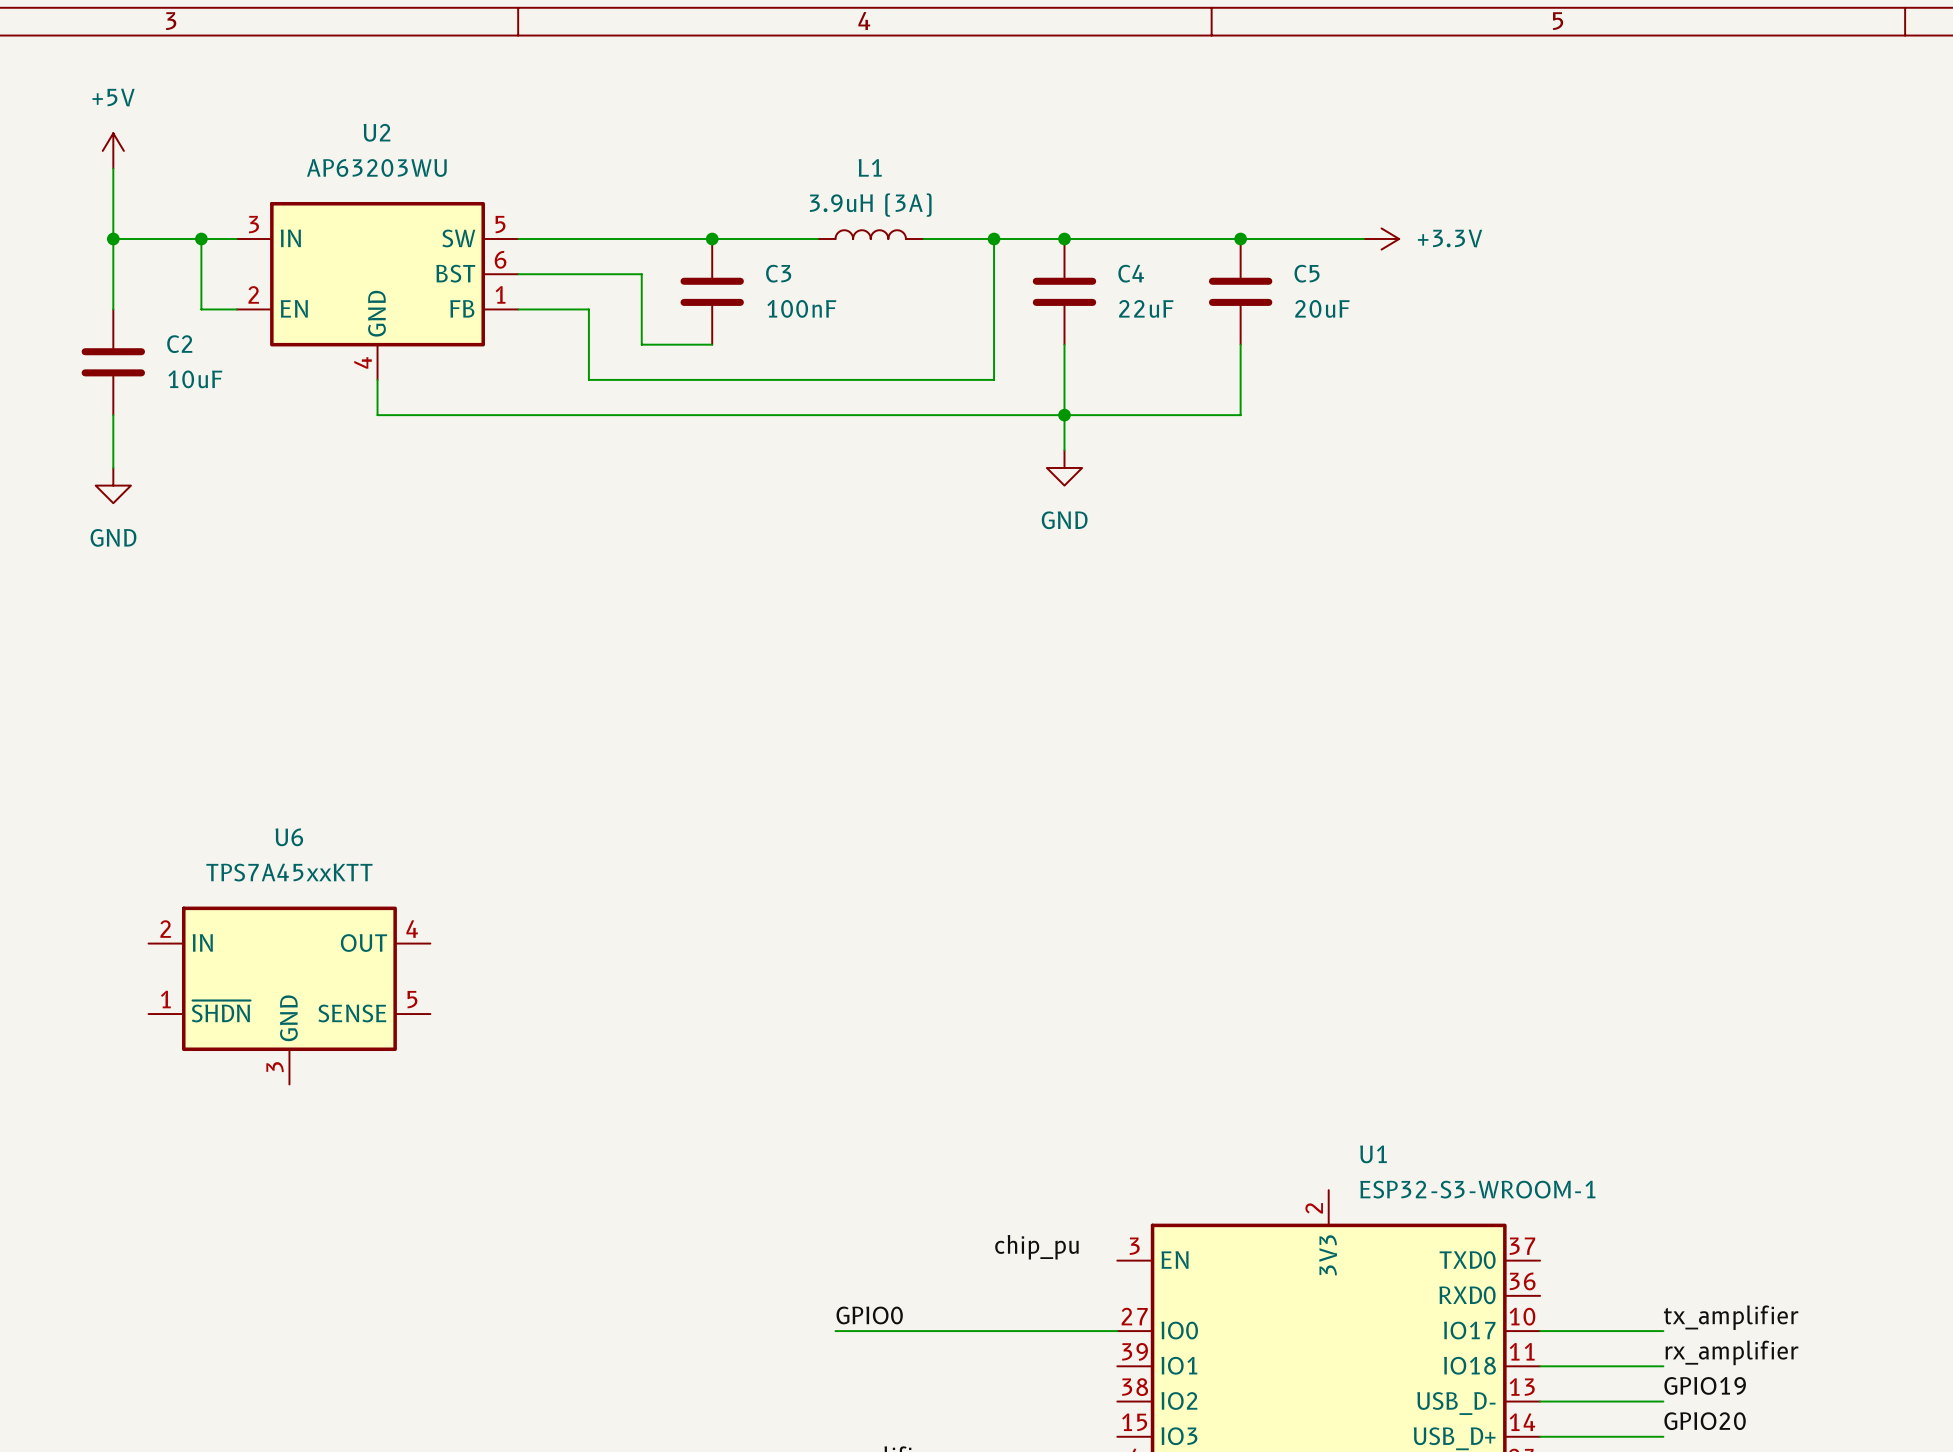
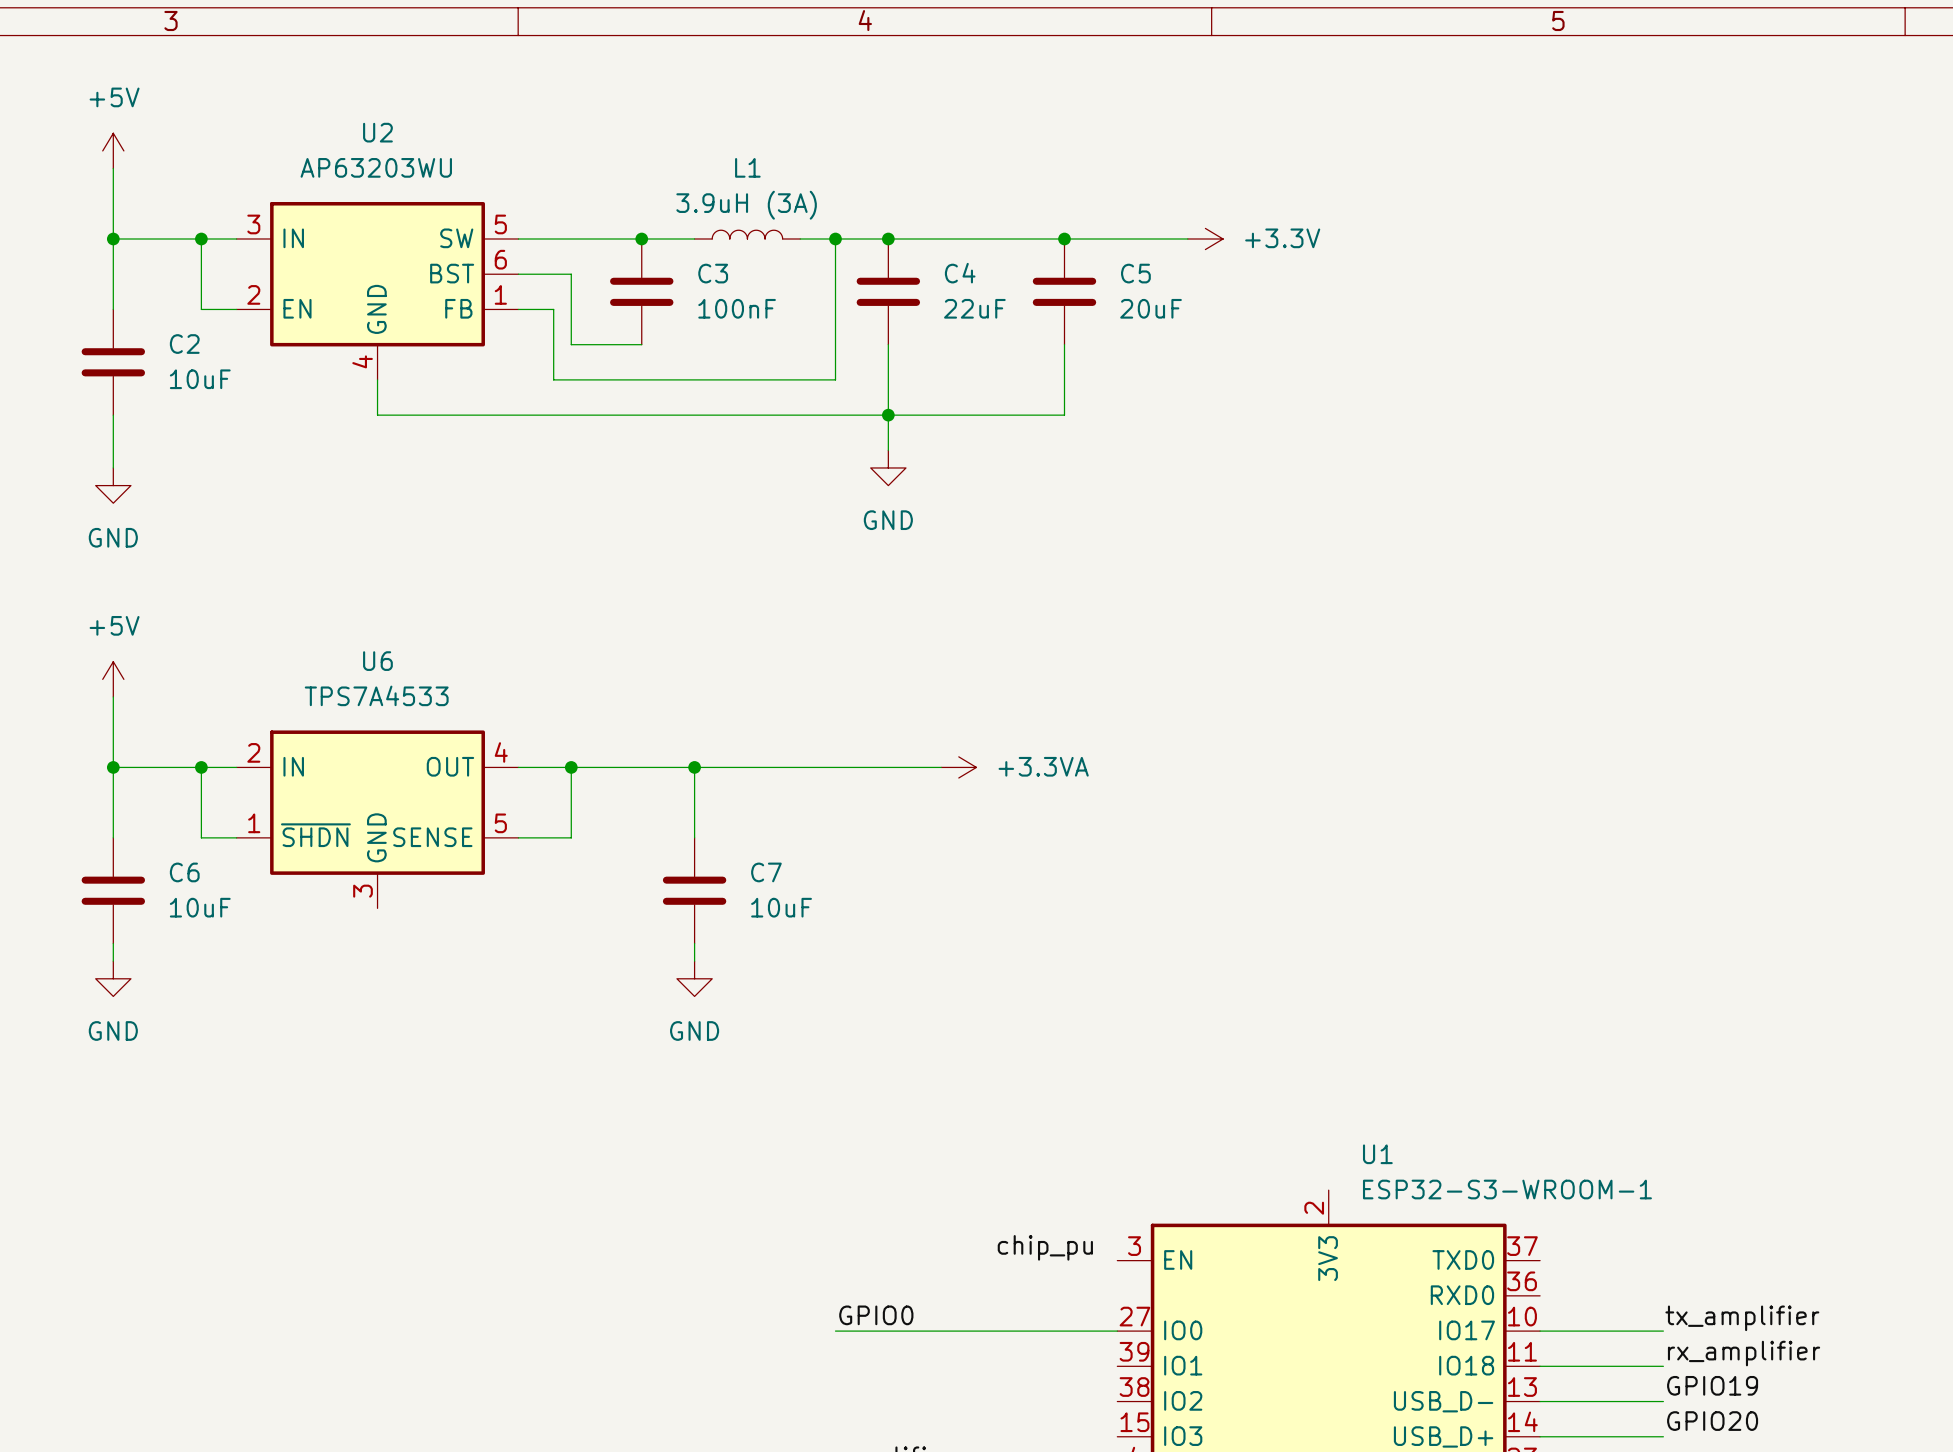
L1 position: (870, 234) -> (747, 234)
junction: none -> (641, 238)
wire: (694, 238) (800, 238) -> (817, 238) (923, 238)
junction: (712, 238) -> none
junction: none -> (835, 238)
junction: none -> (888, 238)
wire: (994, 238) (994, 379) (835, 379) -> (835, 238) (835, 379)
junction: (994, 238) -> none
wire: (1187, 238) (1363, 238) -> none
junction: (1240, 238) -> none
power symbol position: +3.3V (1381, 238) -> +3.3V (1205, 238)
C4 name: C4 (1131, 273) -> C5 (1135, 273)
wire: (571, 274) (641, 274) (641, 344) (712, 344) -> (571, 274) (571, 344) (641, 344)
C3 position: (712, 291) -> (641, 291)
C4: none -> 22uF (888, 291)
C5: 20uF (1240, 291) -> none
C4 value: 22uF (1146, 308) -> 20uF (1151, 308)
wire: (553, 309) (588, 309) (588, 379) -> (553, 309) (553, 379) (588, 379)
wire: none -> (888, 344) (888, 450)
wire: (1240, 344) (1240, 415) (1064, 415) (1064, 450) -> none
junction: none -> (888, 415)
junction: (1064, 415) -> none
power symbol position: GND (1064, 467) -> GND (888, 467)
power symbol: none -> +5V (113, 679)
wire: none -> (113, 696) (113, 837)
wire: none -> (113, 767) (236, 767)
junction: none -> (113, 767)
wire: none -> (201, 767) (201, 837) (236, 837)
junction: none -> (201, 767)
wire: none -> (518, 767) (941, 767)
wire: none -> (571, 767) (571, 837) (518, 837)
junction: none -> (571, 767)
wire: none -> (694, 767) (694, 837)
junction: none -> (694, 767)
power symbol: none -> +3.3VA (958, 767)
U6 value: TPS7A45xxKTT (289, 872) -> TPS7A4533 (376, 695)
C6: none -> 10uF (113, 890)
C7: none -> 10uF (694, 890)
wire: none -> (113, 943) (113, 961)
wire: none -> (694, 943) (694, 961)
power symbol: none -> GND (113, 978)
power symbol: none -> GND (694, 978)
U6 position: (289, 995) -> (377, 819)

